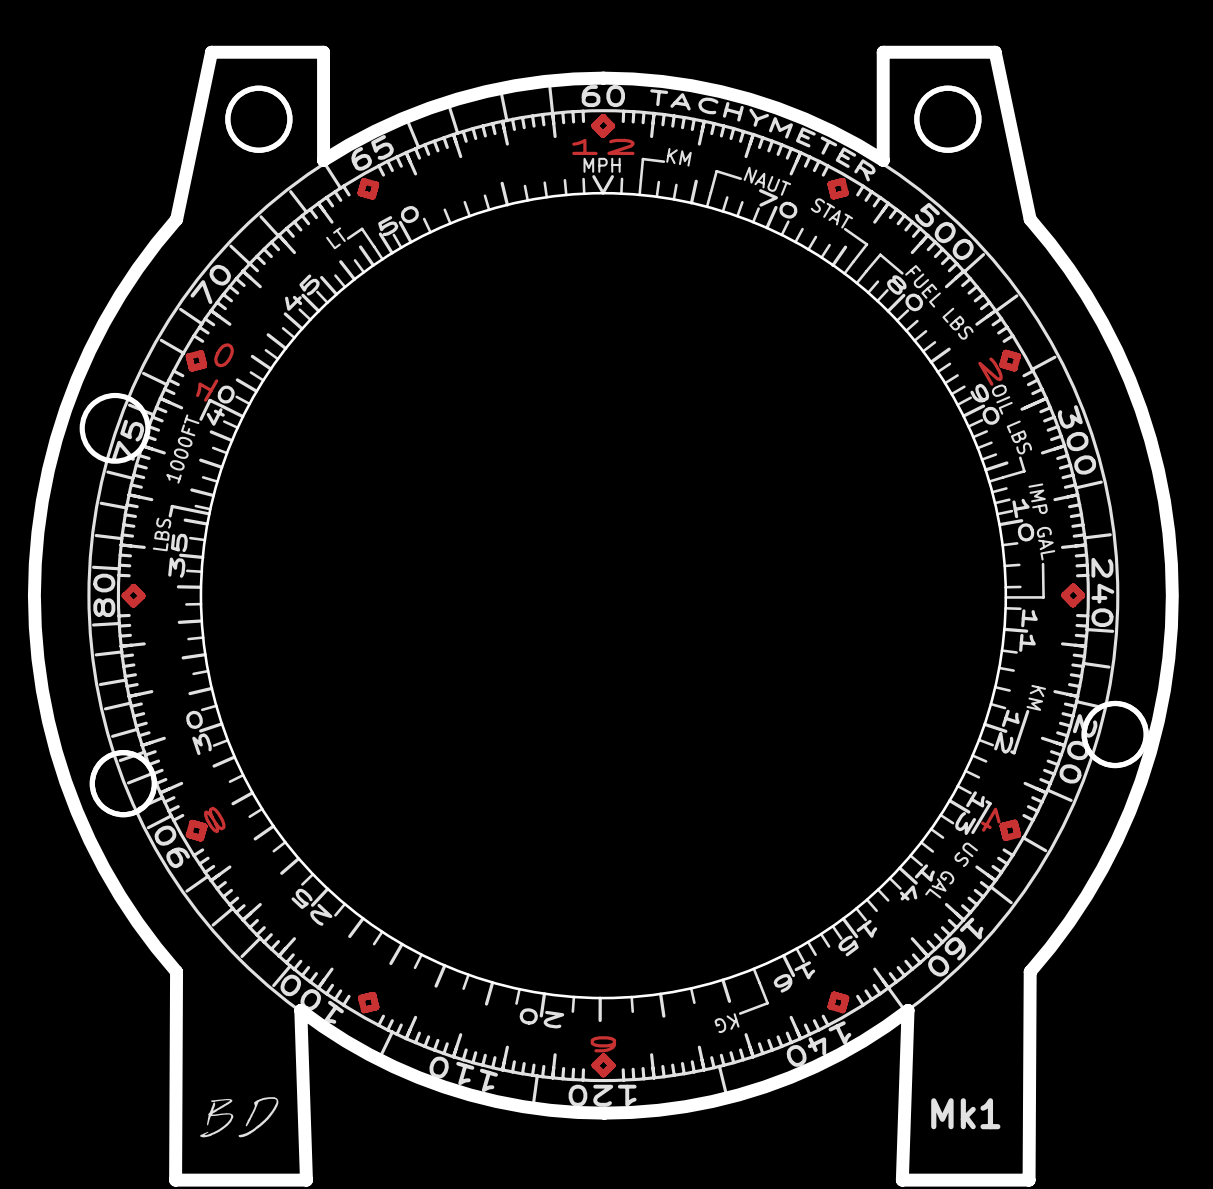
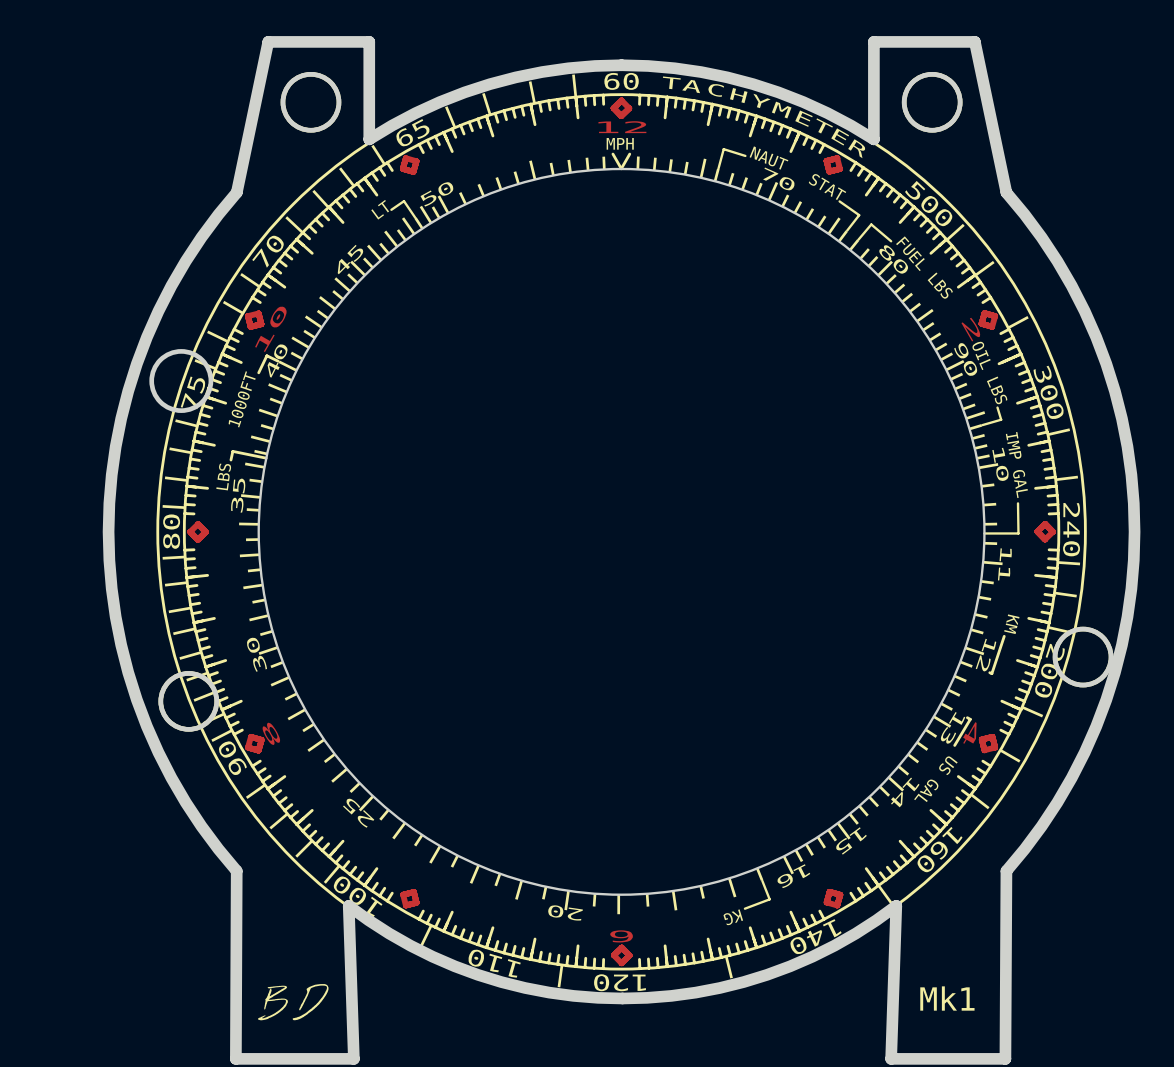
text: KM (678, 157) -> none
line: (663, 161) (642, 159) (640, 180) -> none

